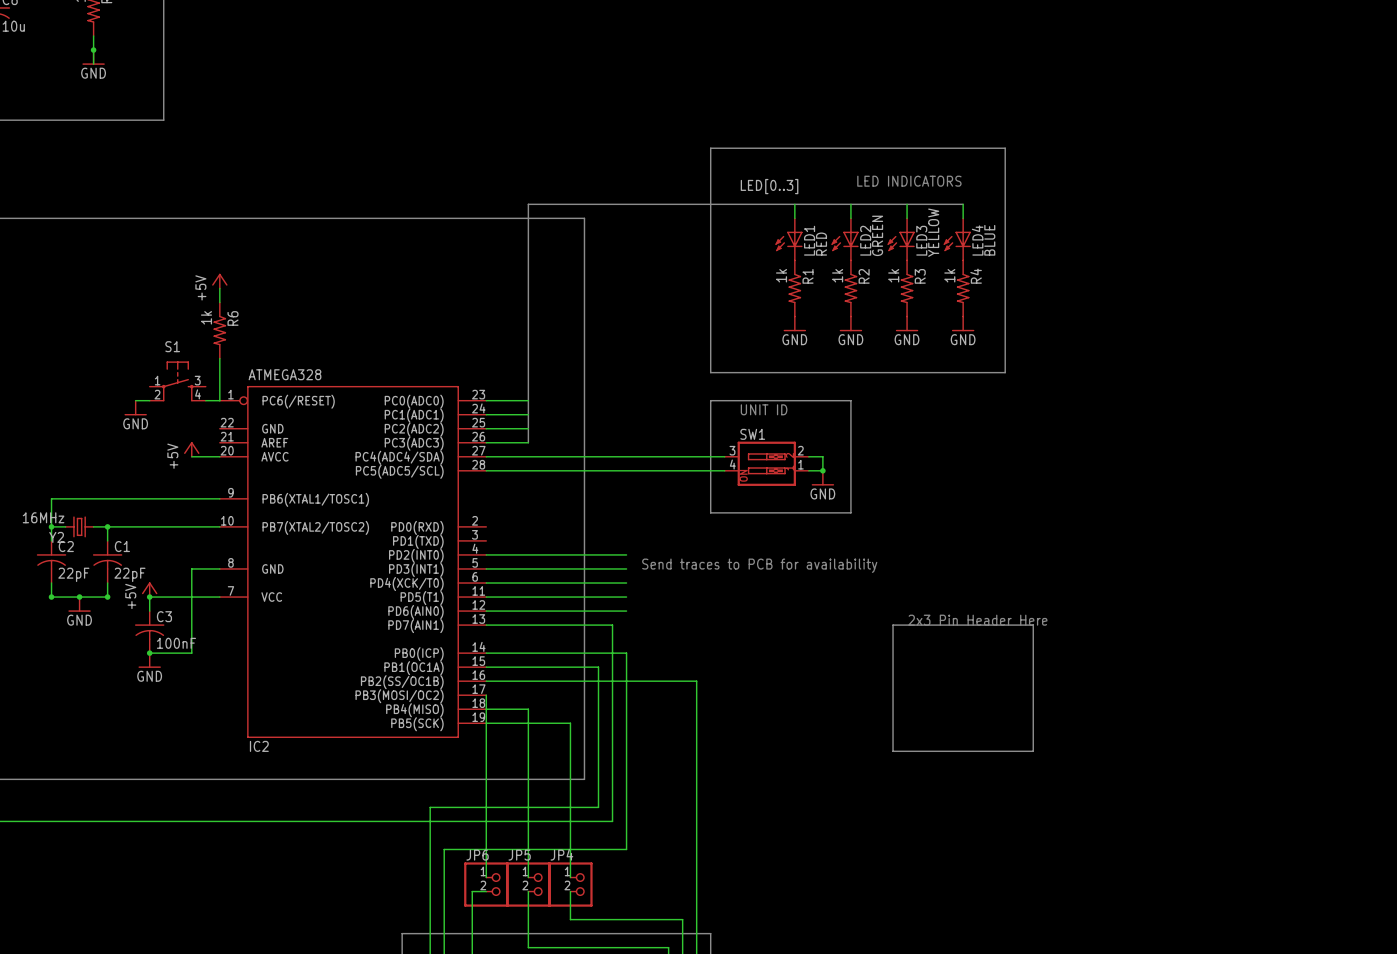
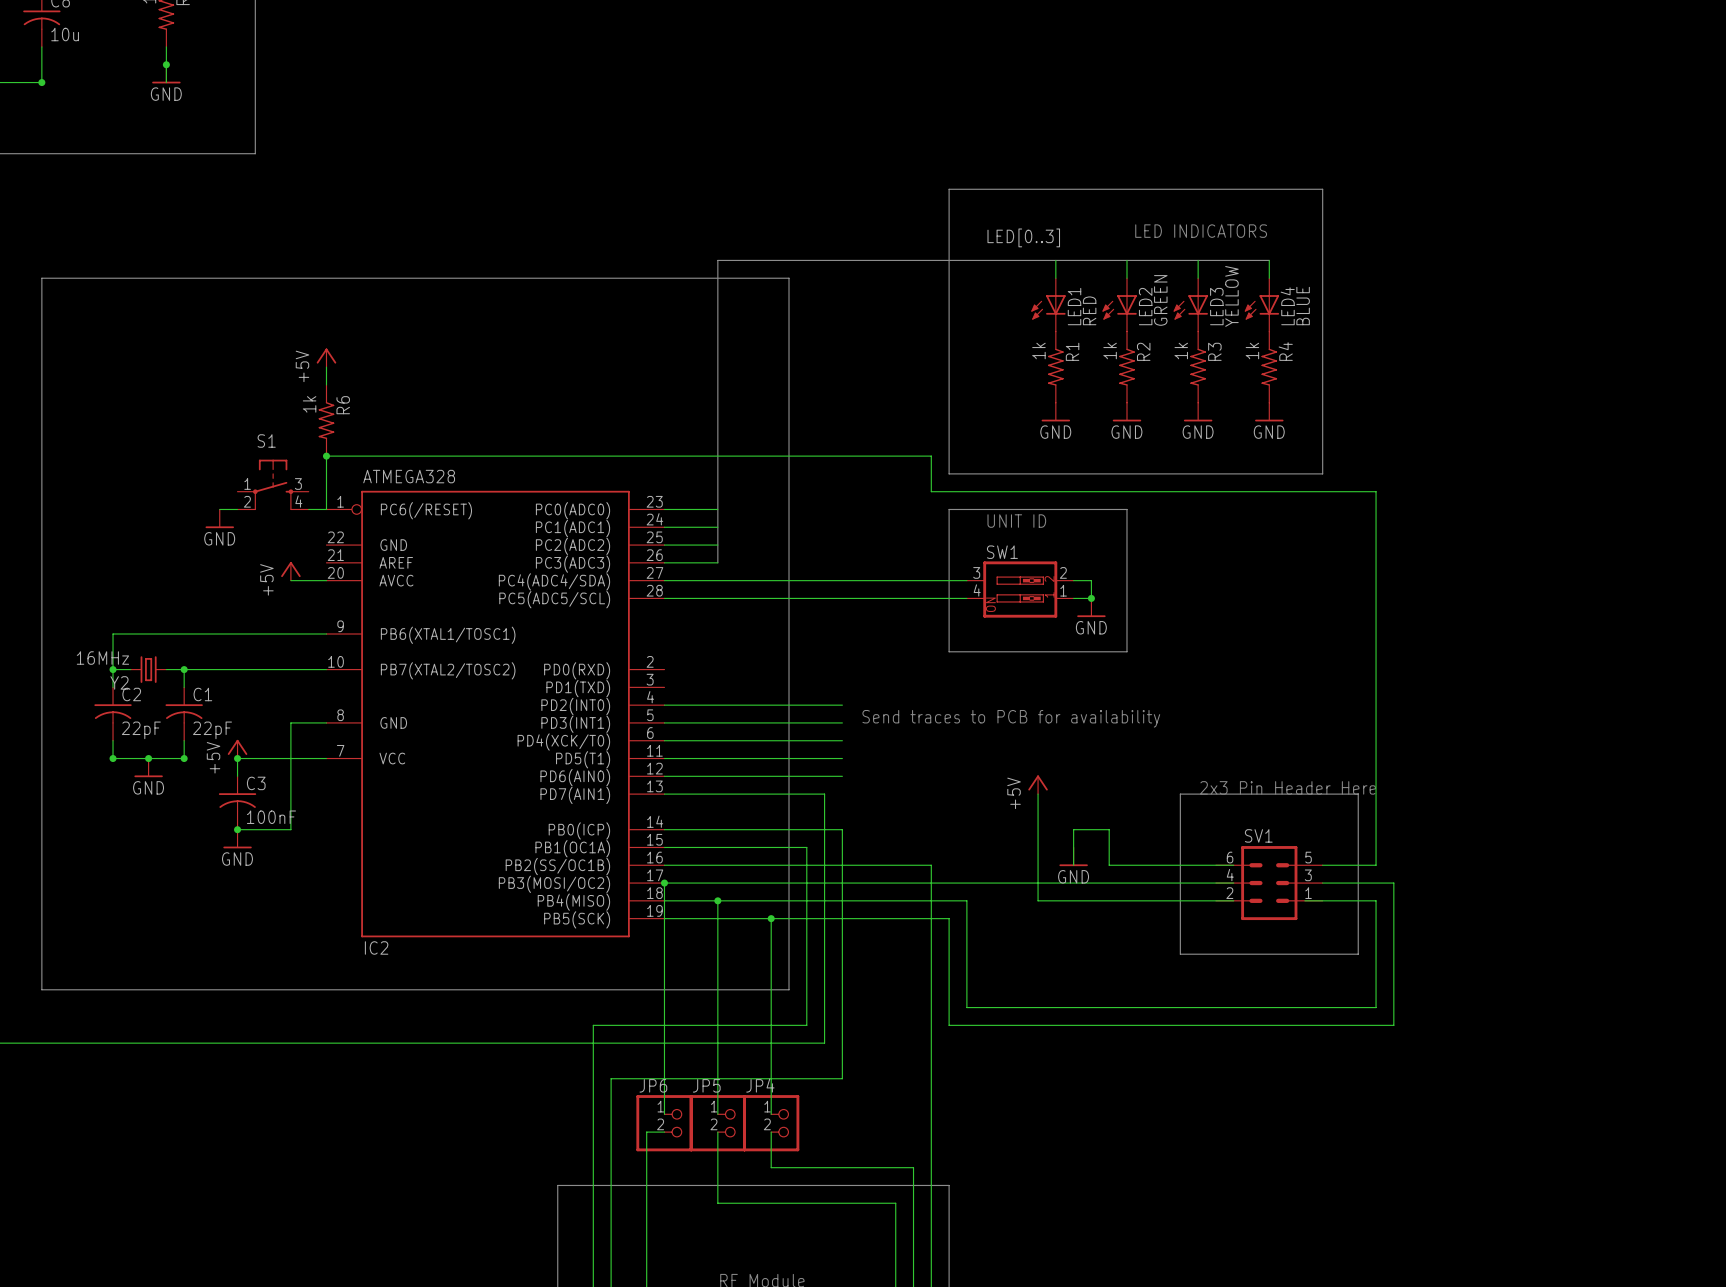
wire: none -> (326, 456) (931, 456) (931, 491) (1376, 491) (1376, 865) (1322, 865)
junction: none -> (326, 456)
power symbol: none -> +5V (1038, 784)
wire: none -> (1038, 794) (1038, 900) (1233, 900)
power symbol: none -> GND (1073, 856)
wire: none -> (1073, 865) (1073, 829) (1109, 829) (1109, 865) (1233, 865)
wire: none -> (664, 883) (1233, 883)
junction: none -> (664, 883)
SV1: none -> (1269, 883)
wire: none -> (1322, 883) (1393, 883) (1393, 1025) (949, 1025) (949, 918) (771, 918)
wire: none -> (717, 900) (966, 900) (966, 1007) (1376, 1007) (1376, 900) (1304, 900)
junction: none -> (717, 900)
junction: none -> (771, 918)

